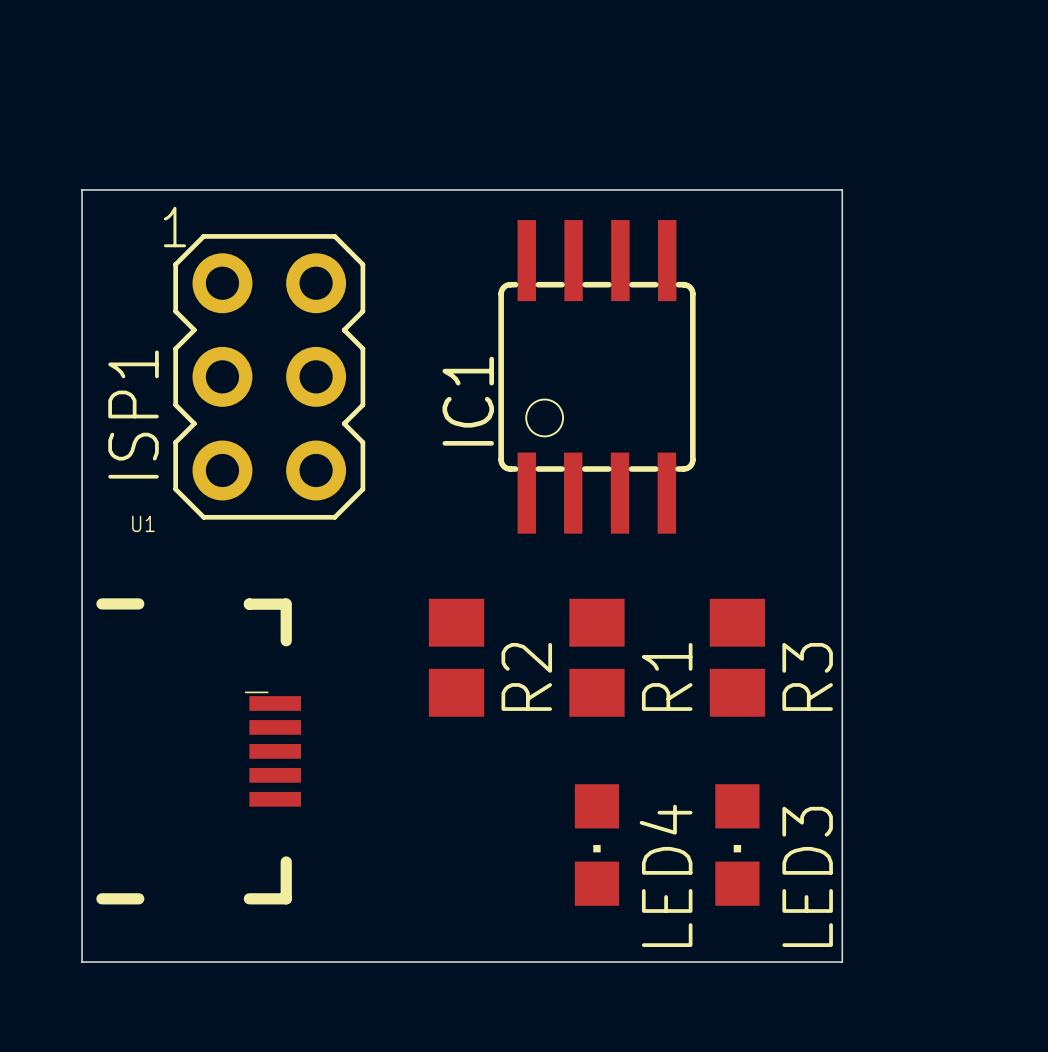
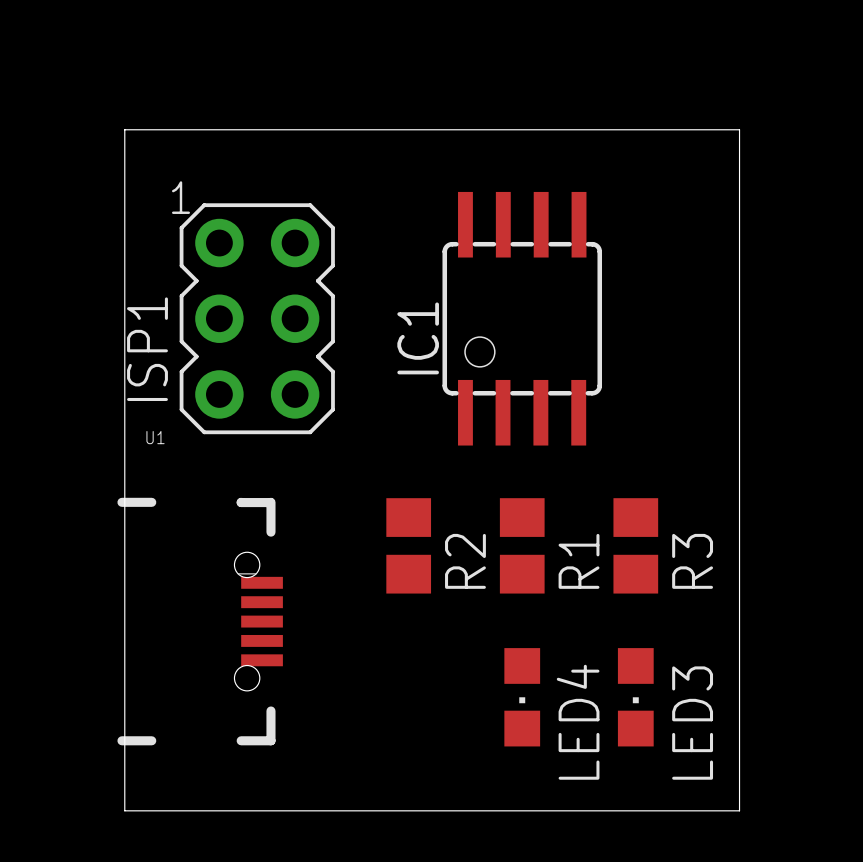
board edge: (82, 189) (842, 189) (842, 962) (82, 962) (82, 189) -> (124, 129) (124, 810) (739, 810) (739, 129) (124, 129)
U1 footprint: [96, 598, 301, 905] -> [117, 497, 283, 746]

